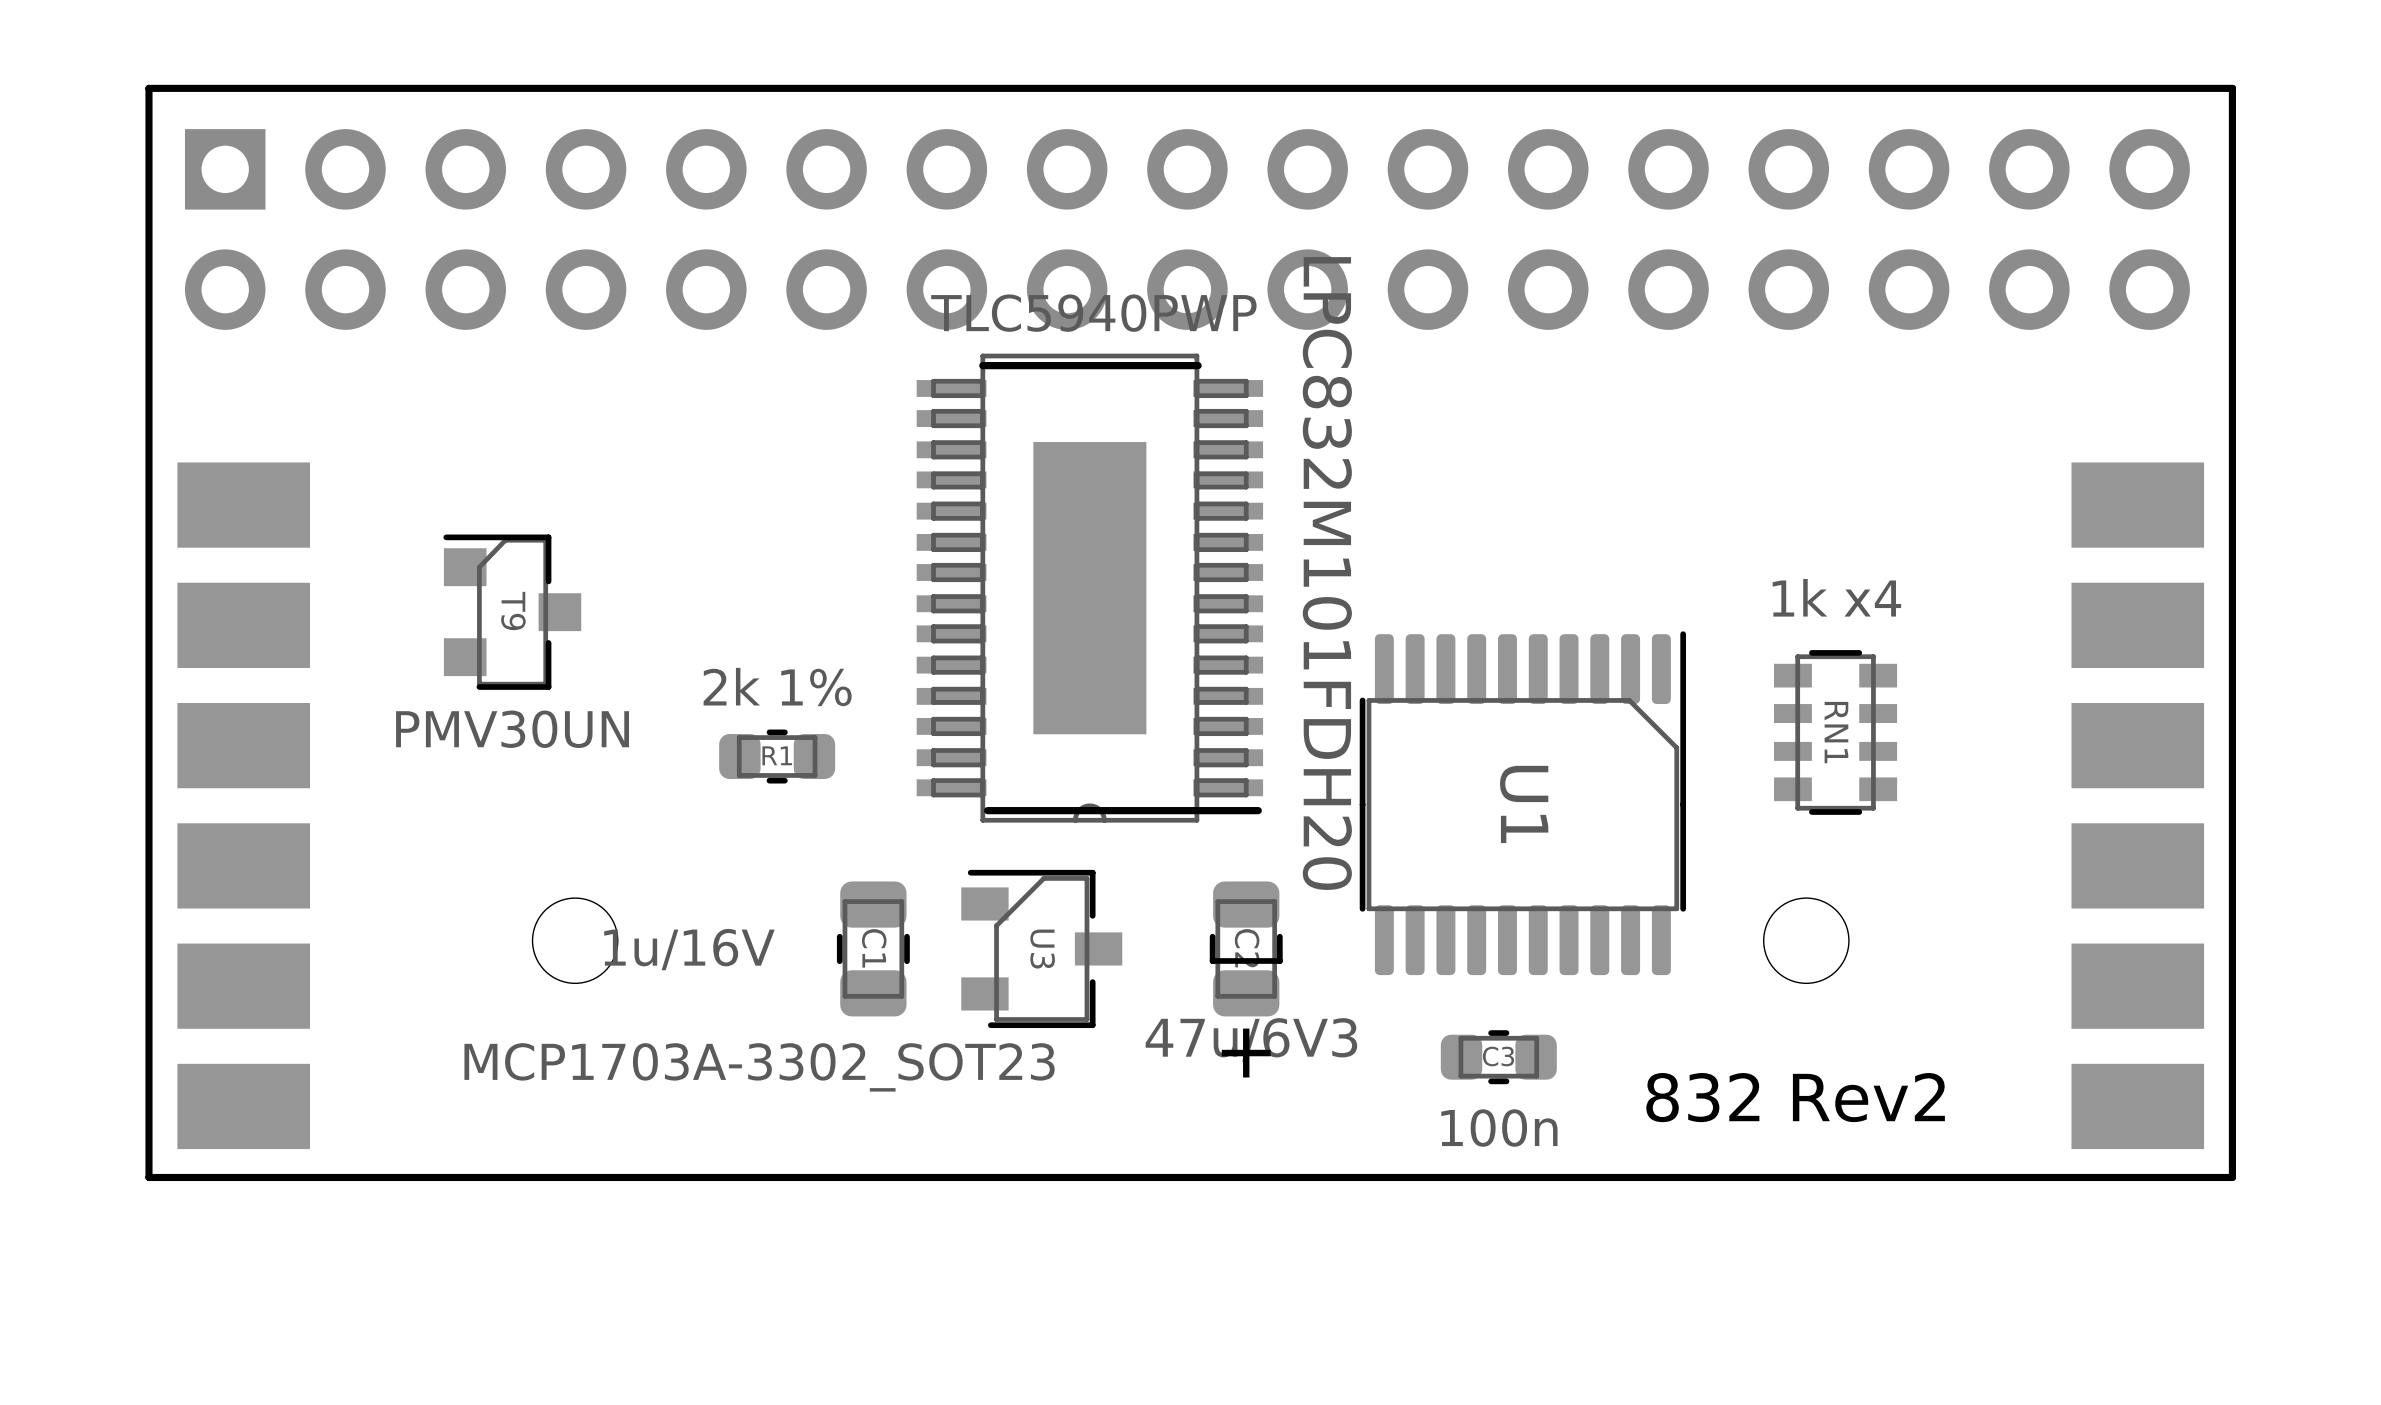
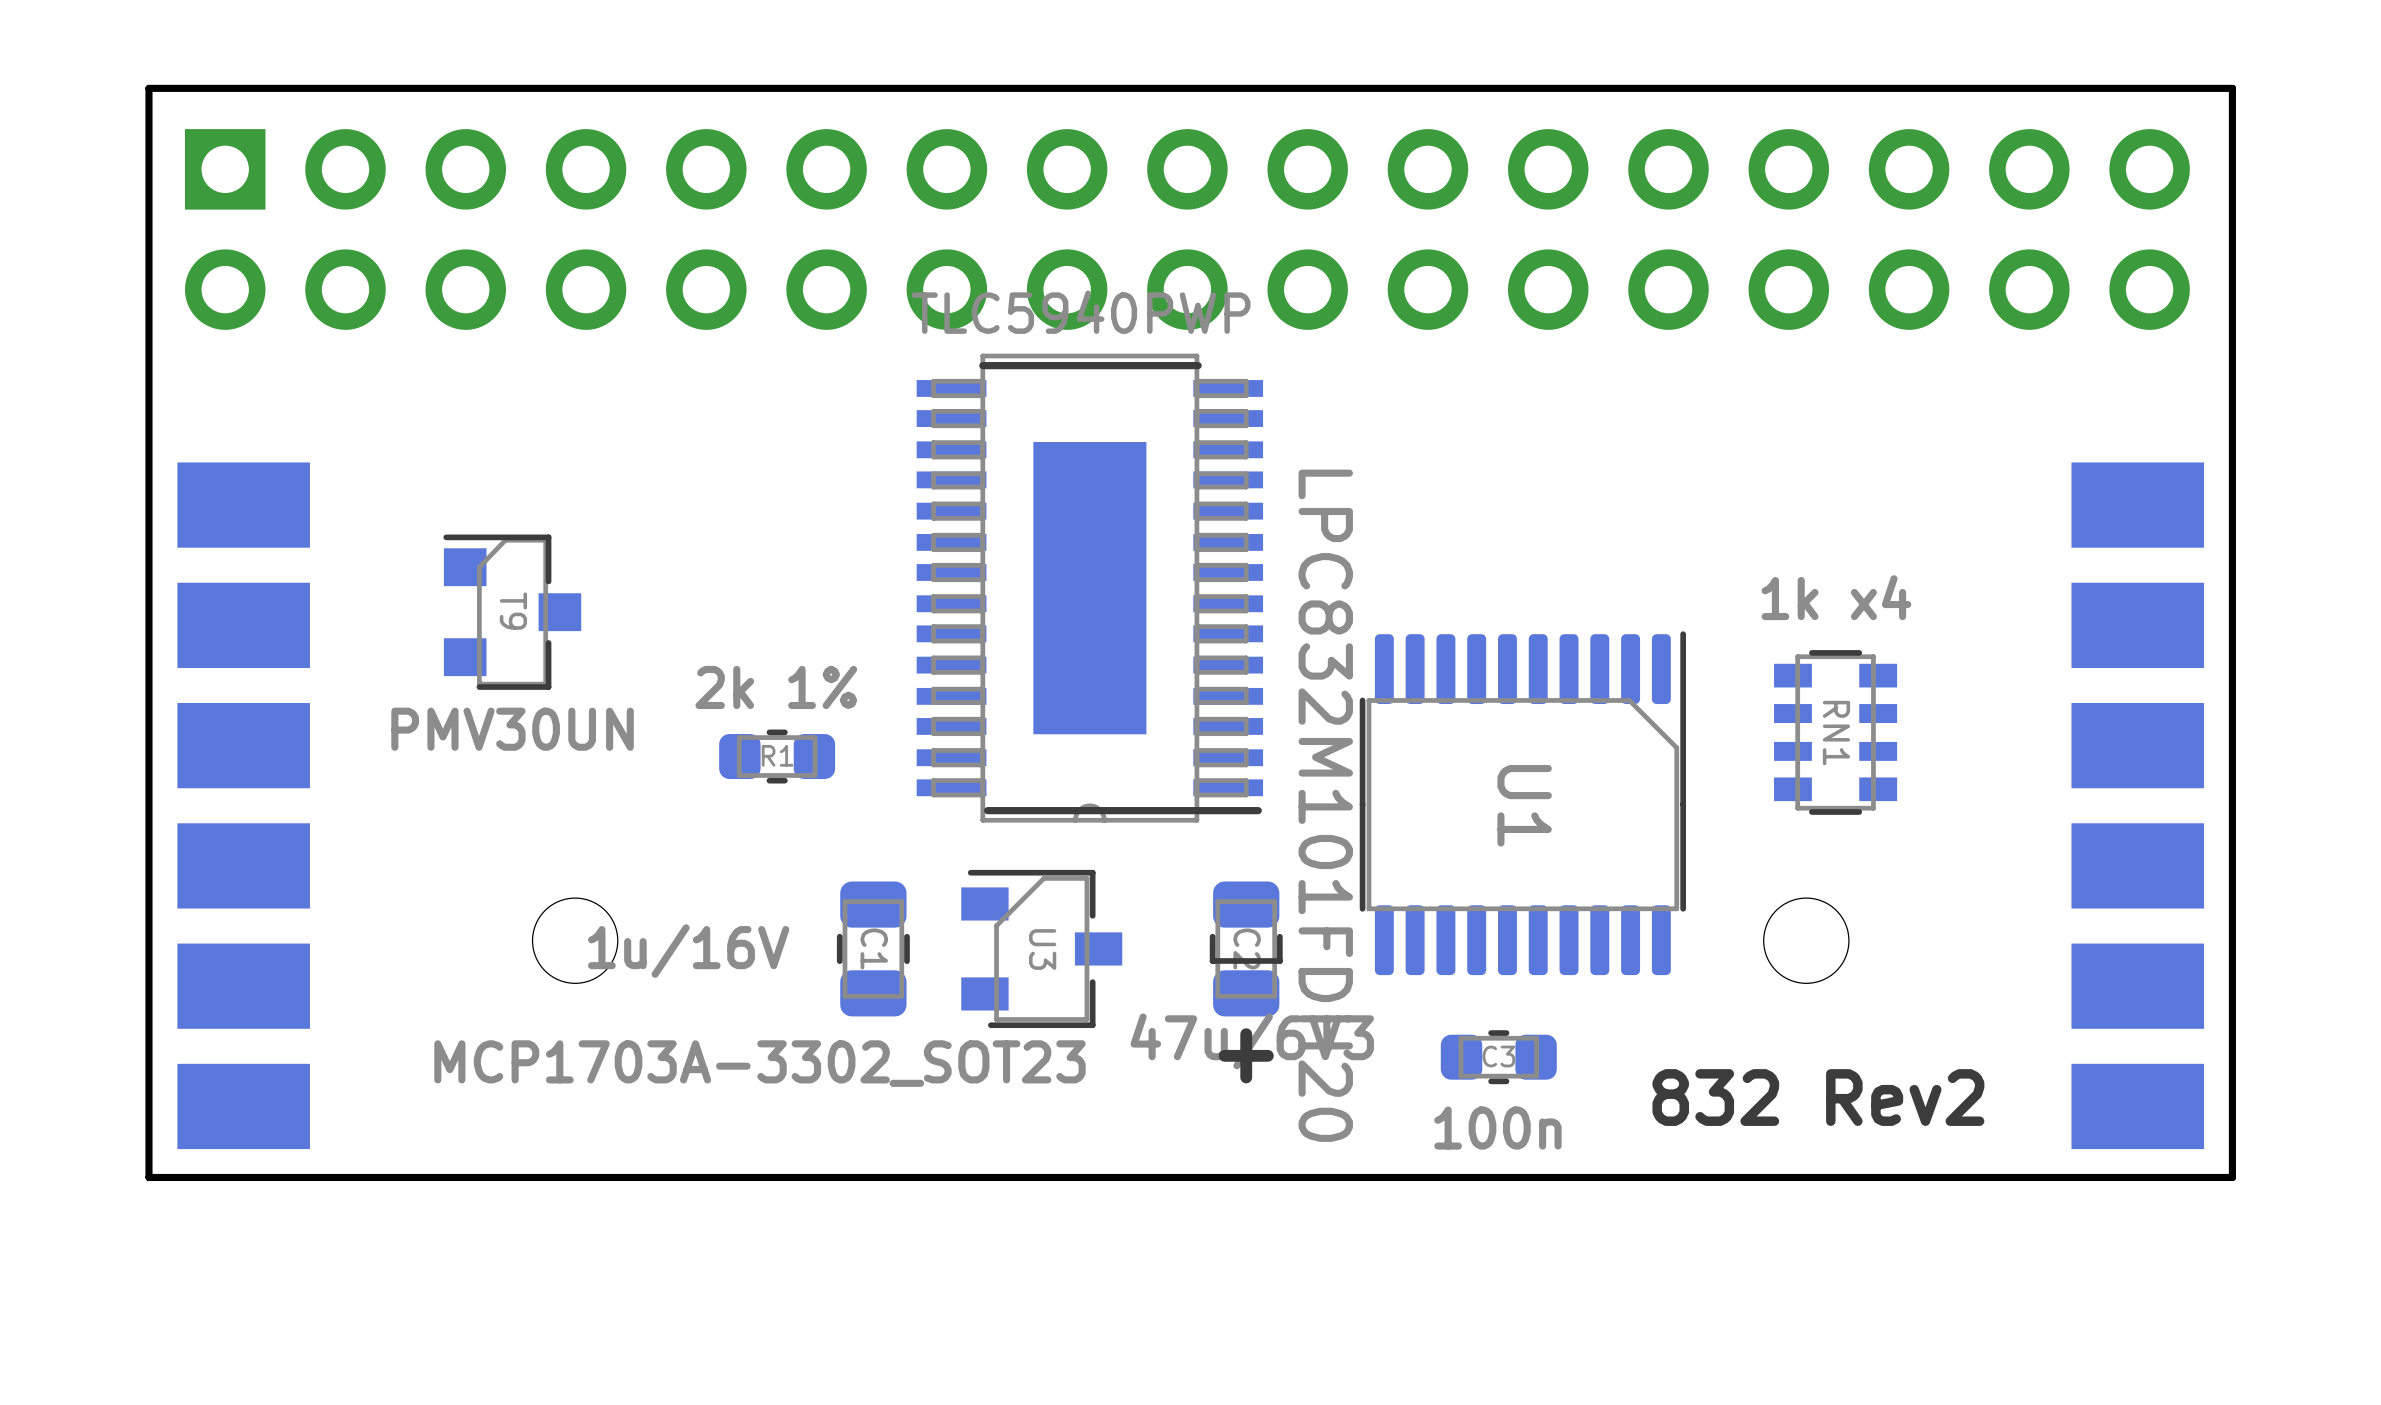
U1 value position: LPC832M101FDH20 (1327, 573) -> LPC832M101FDH20 (1325, 805)

